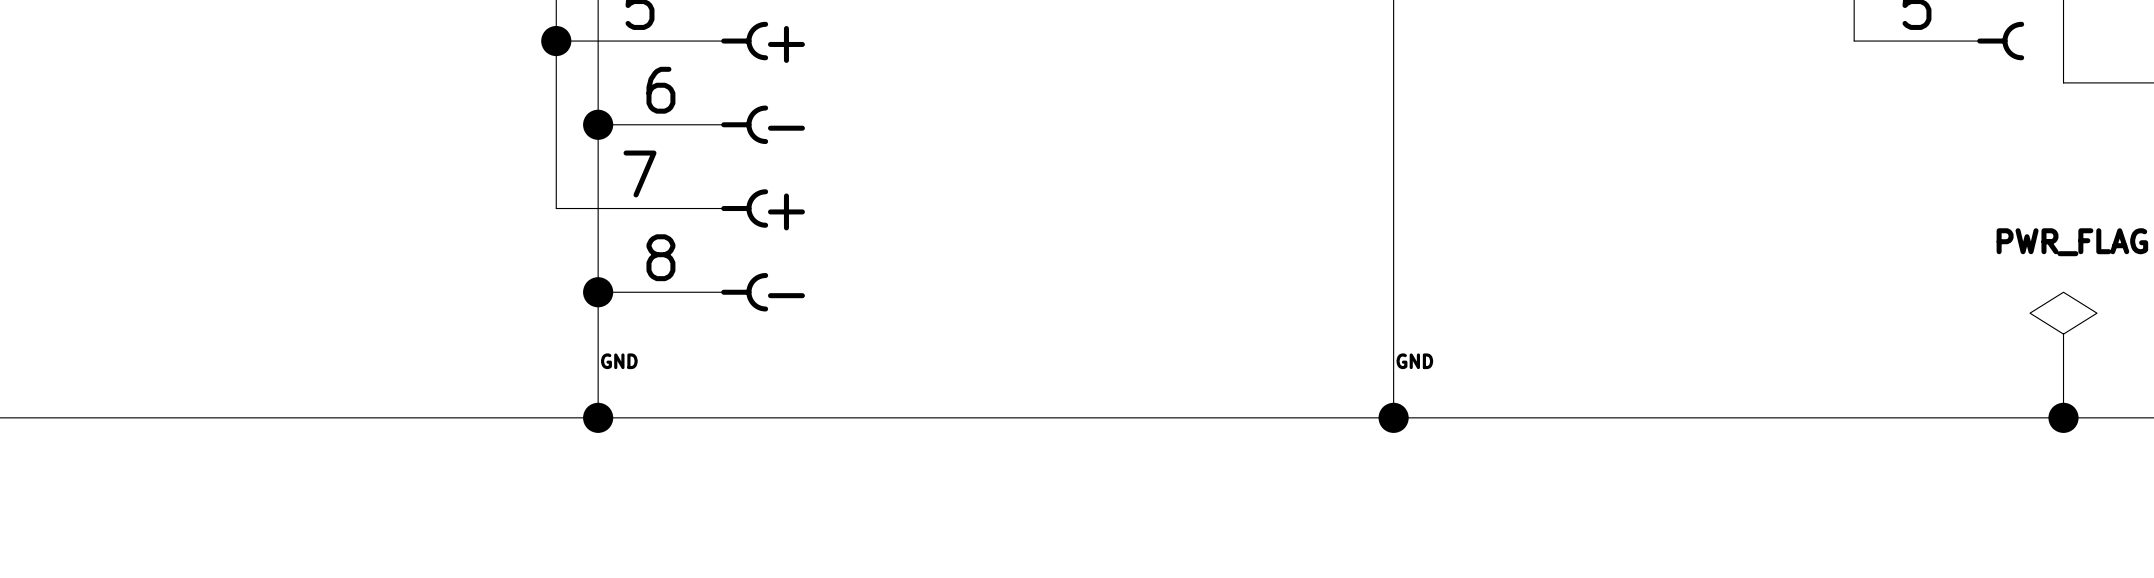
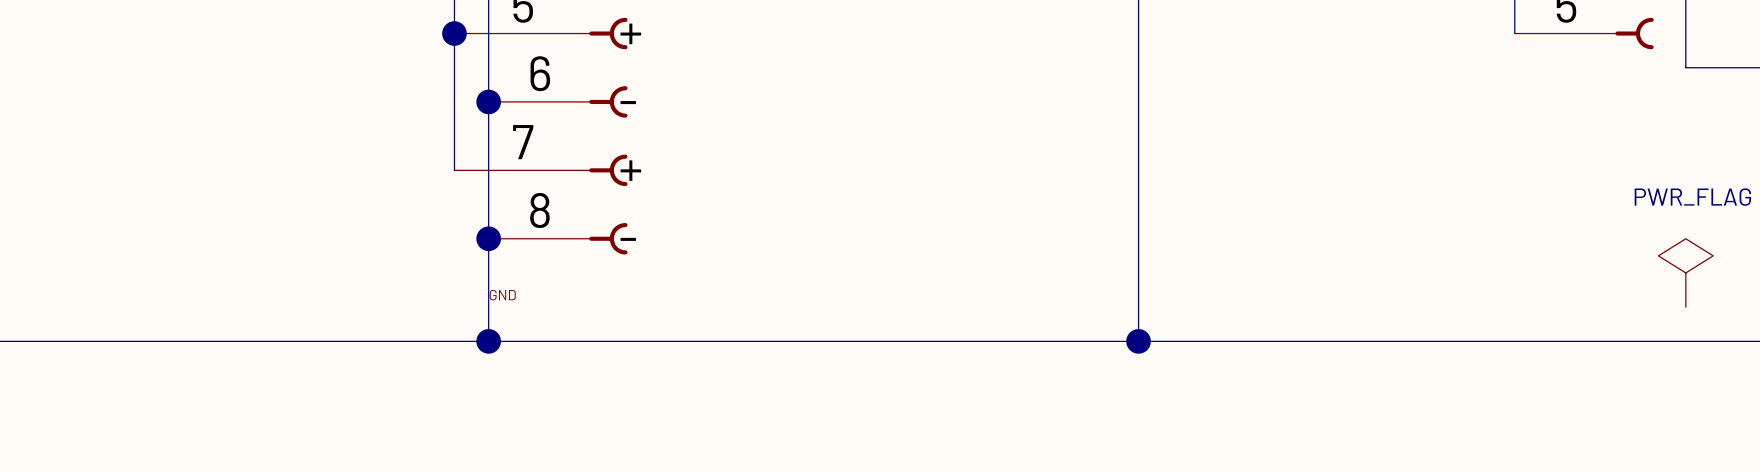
label: GND (1414, 361) -> none
wire: (2063, 375) (2063, 417) -> none
junction: (2063, 417) -> none

